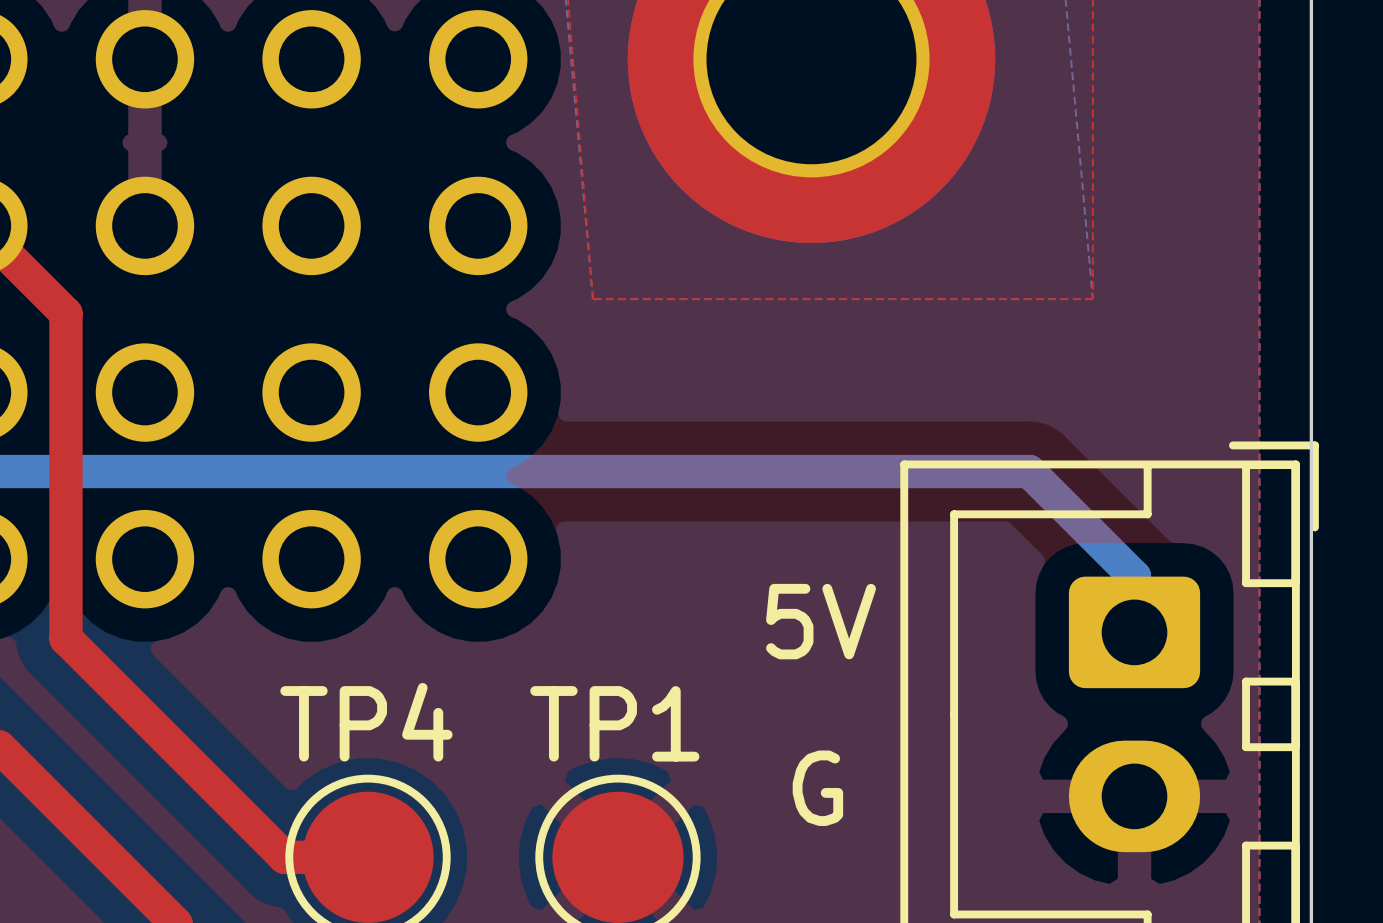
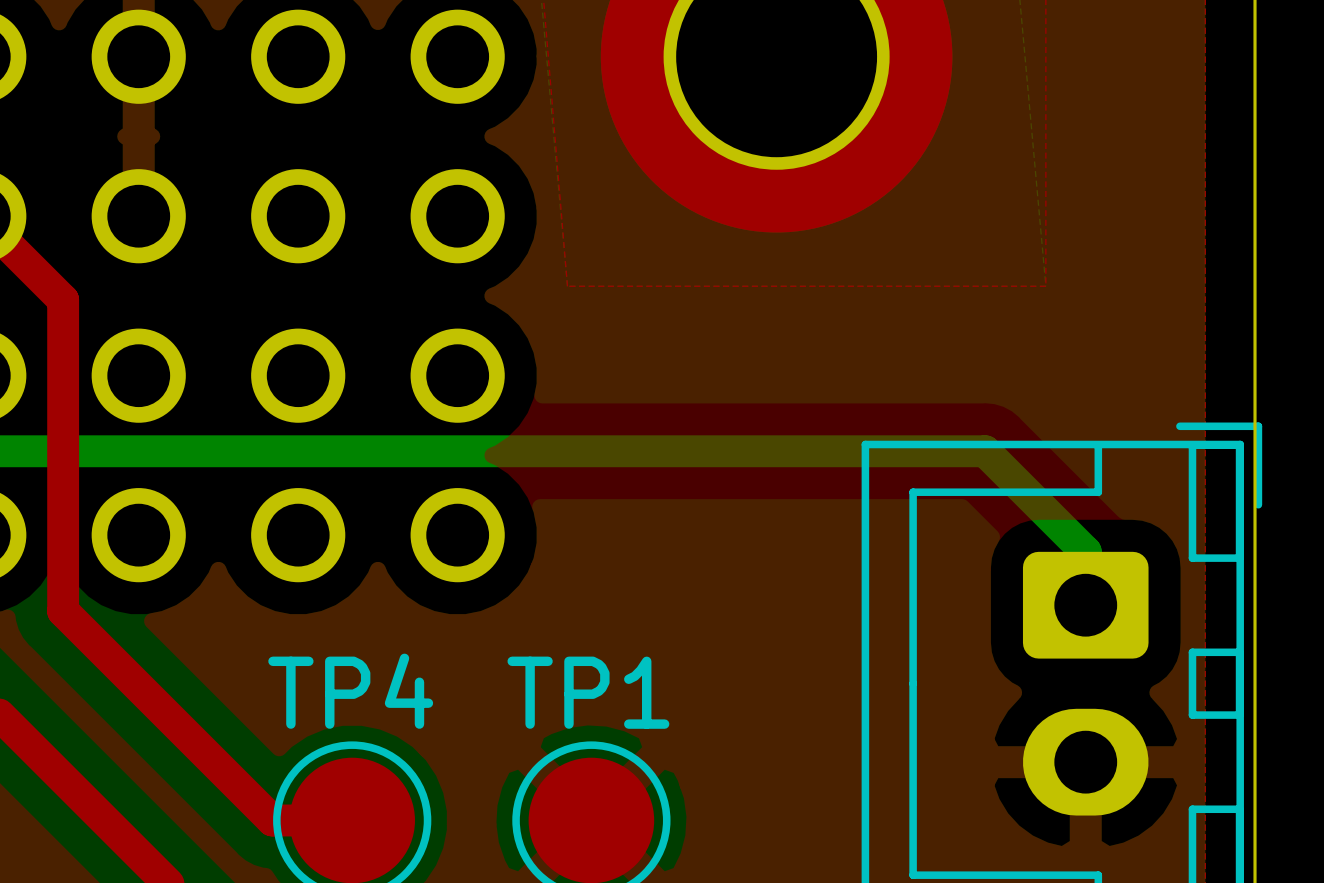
text: 5V (821, 621) -> none
text: G (817, 788) -> none

